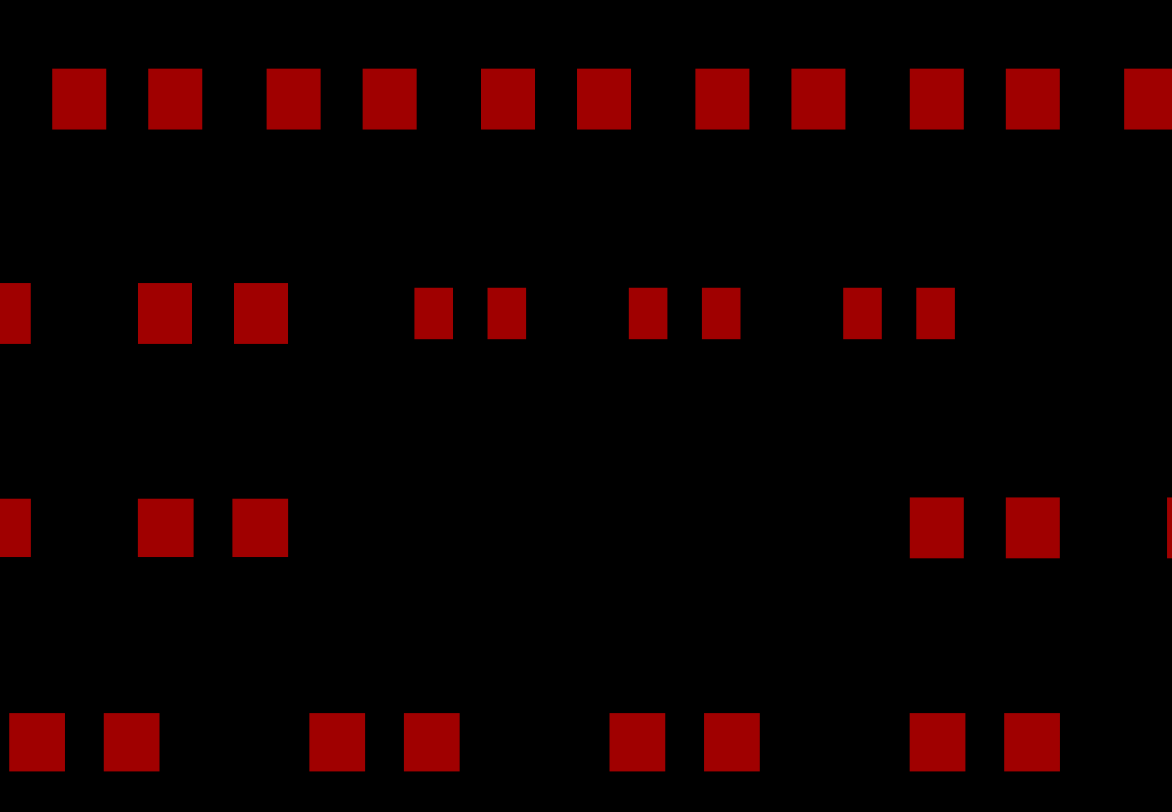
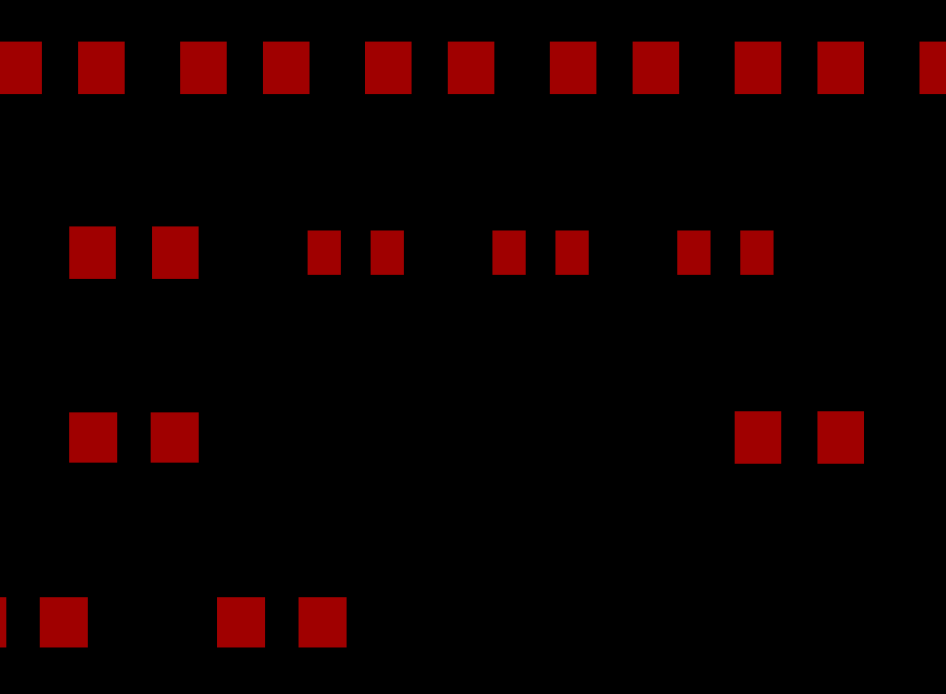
part: (684, 742) -> none
part: (984, 742) -> none

